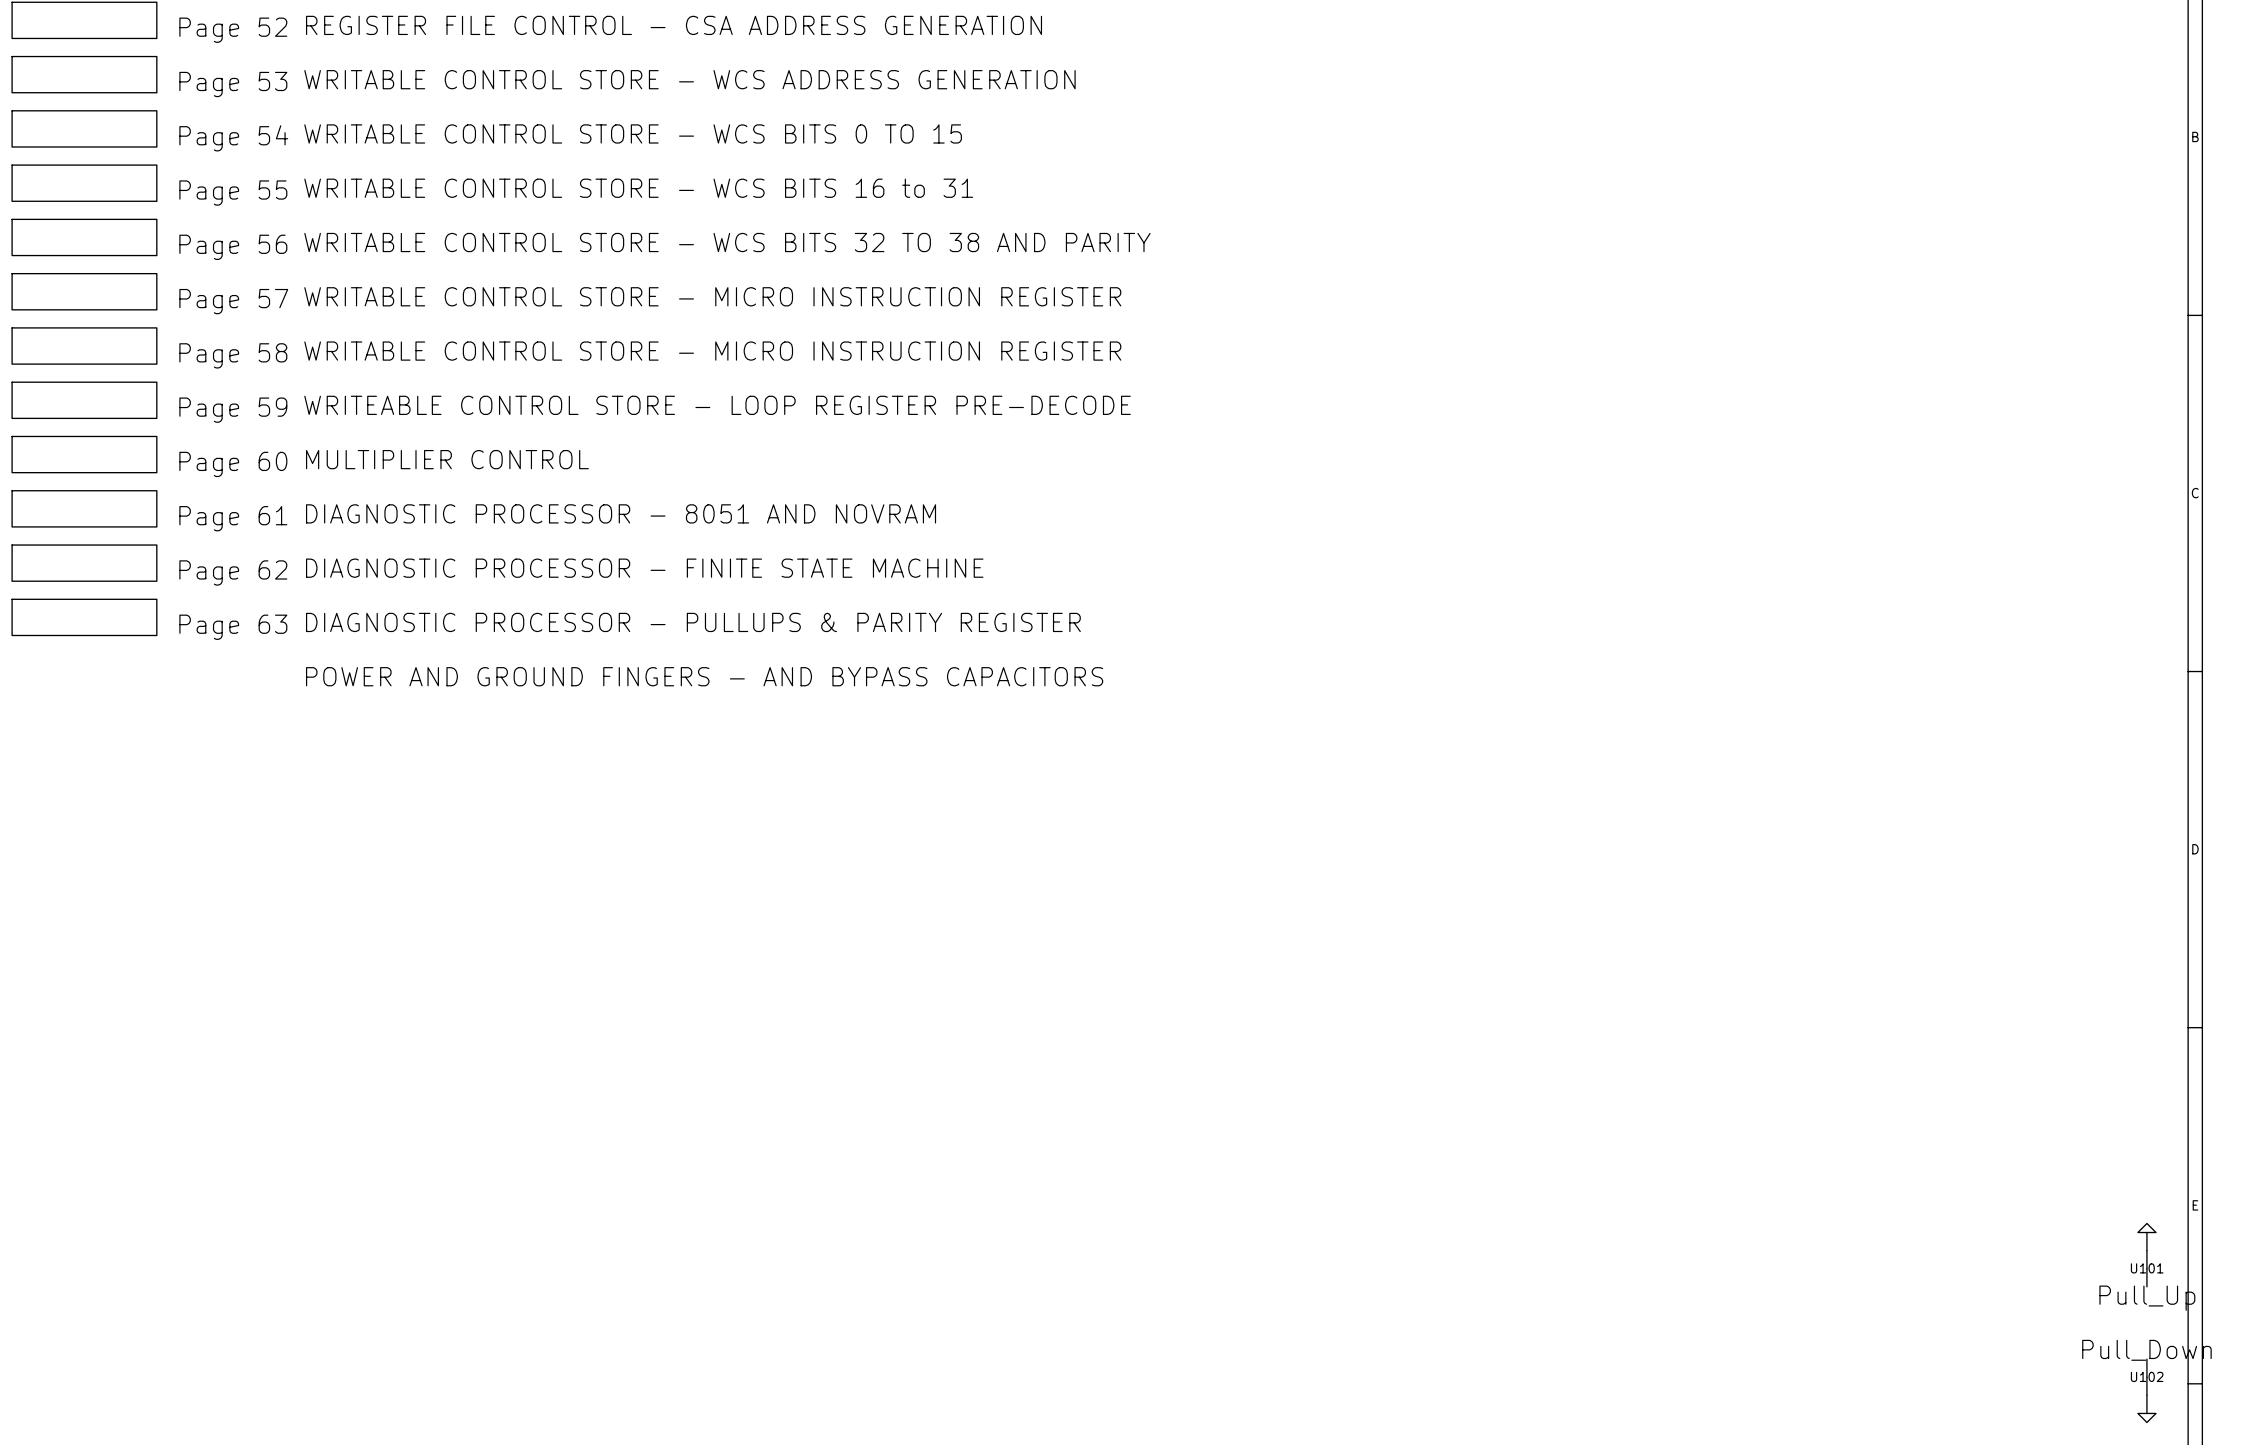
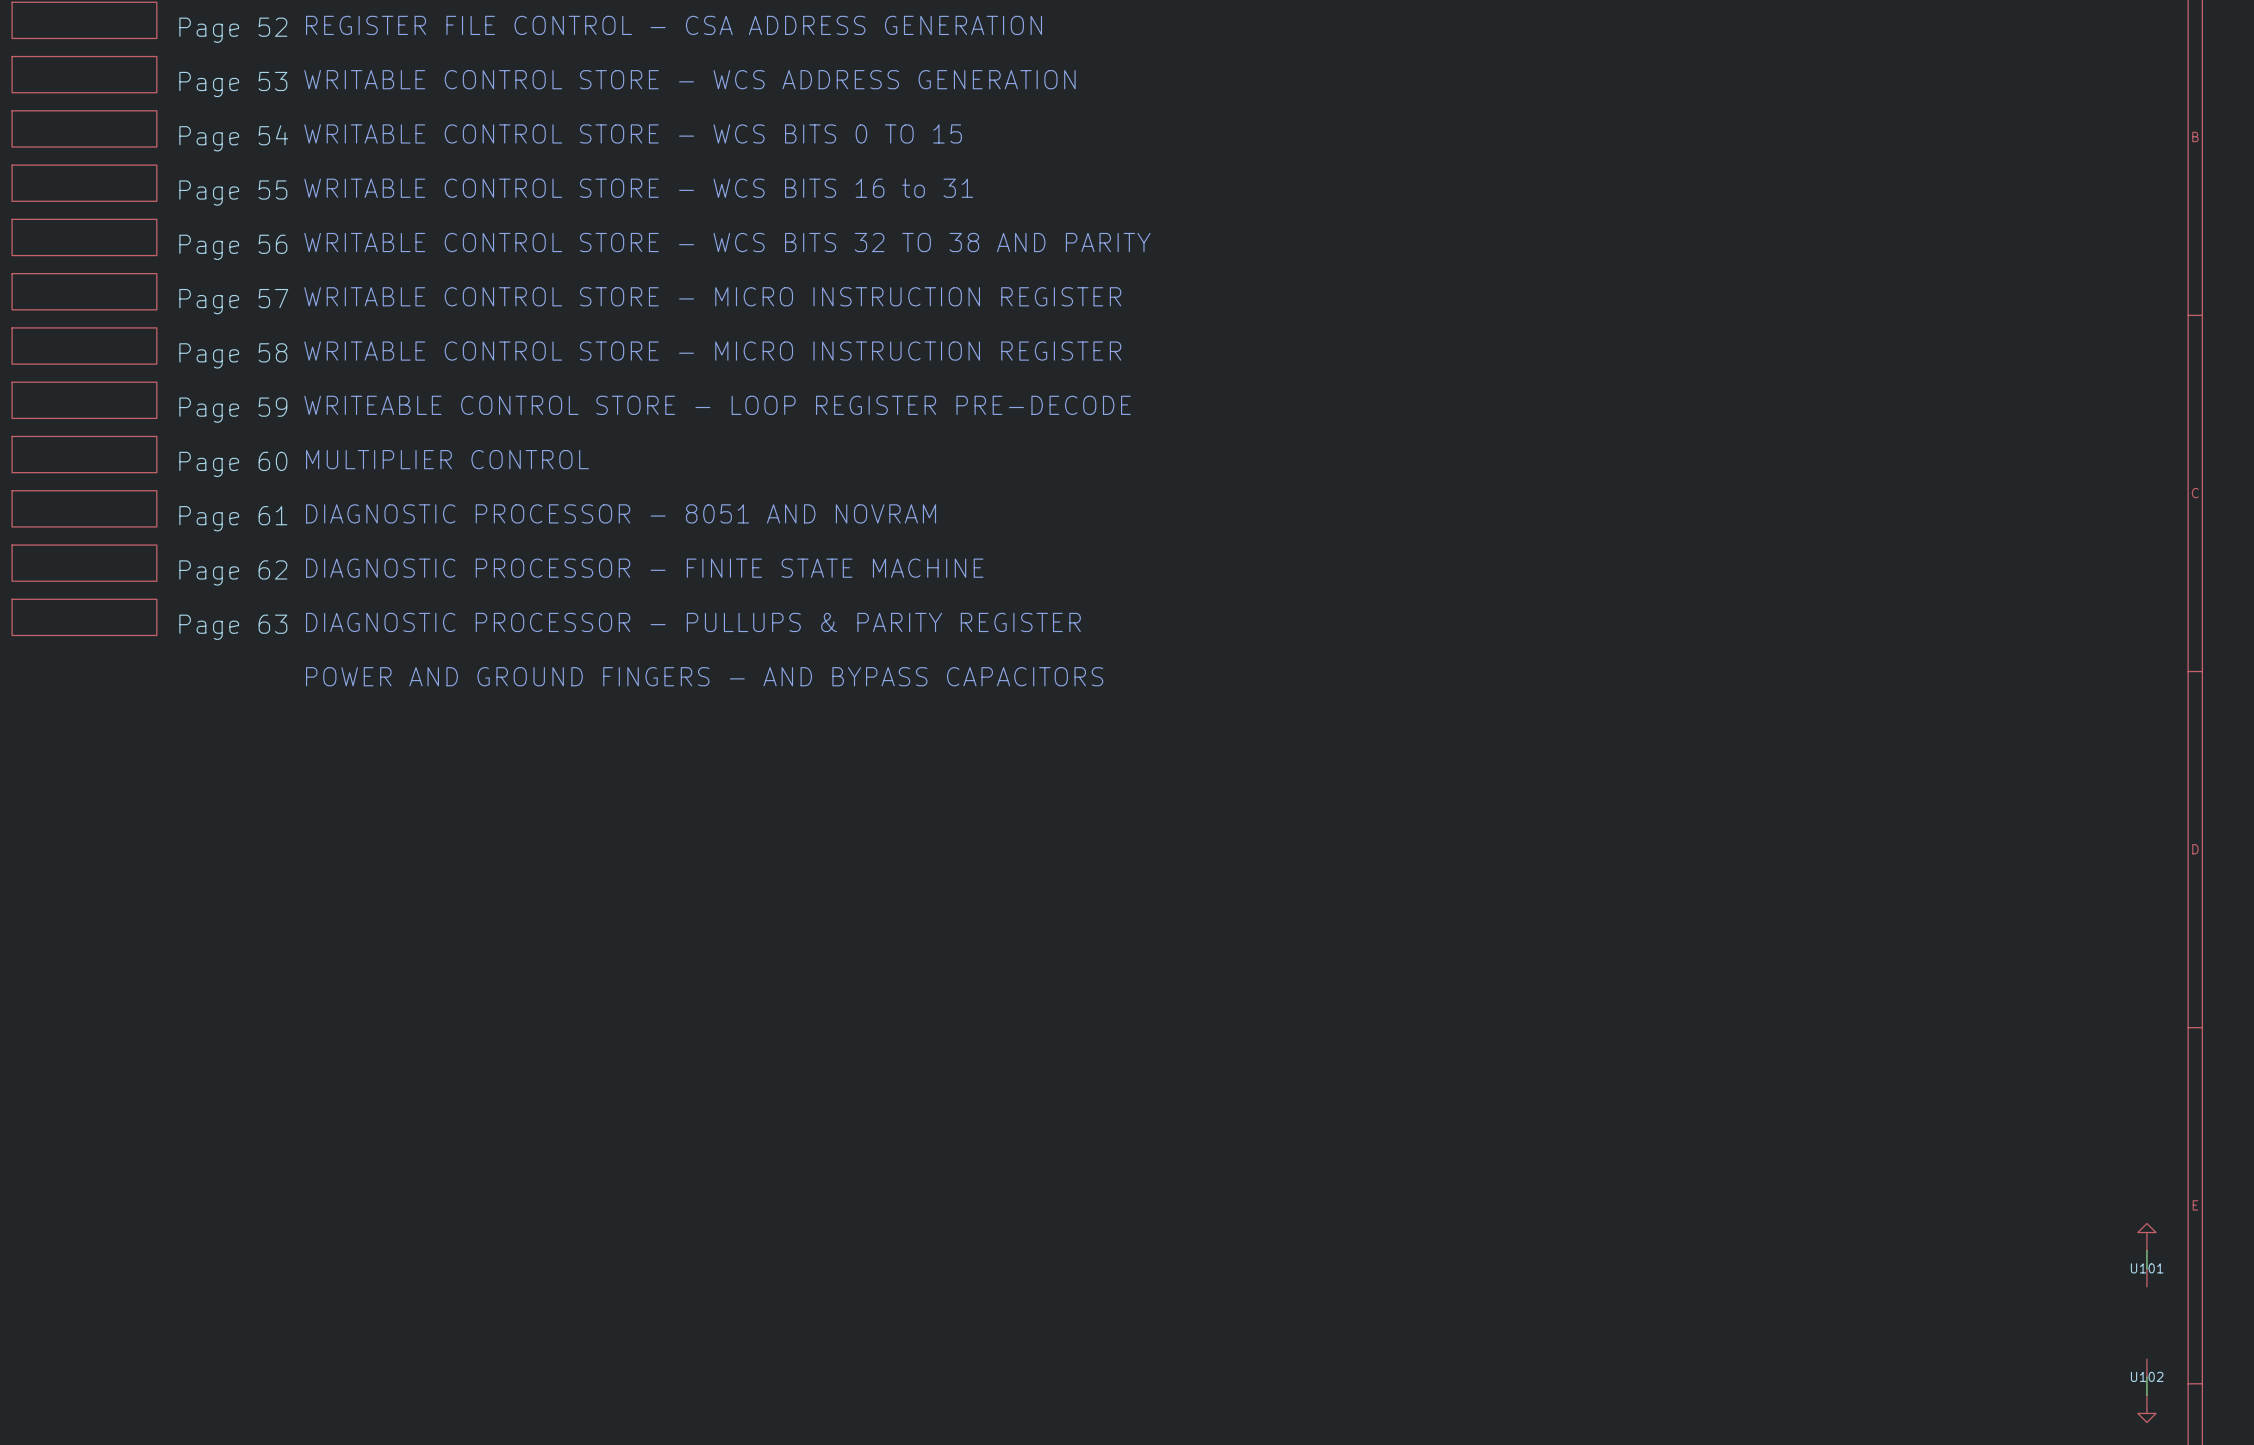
U101 value: Pull_Up (2147, 1298) -> none
U102 value: Pull_Down (2146, 1350) -> none

